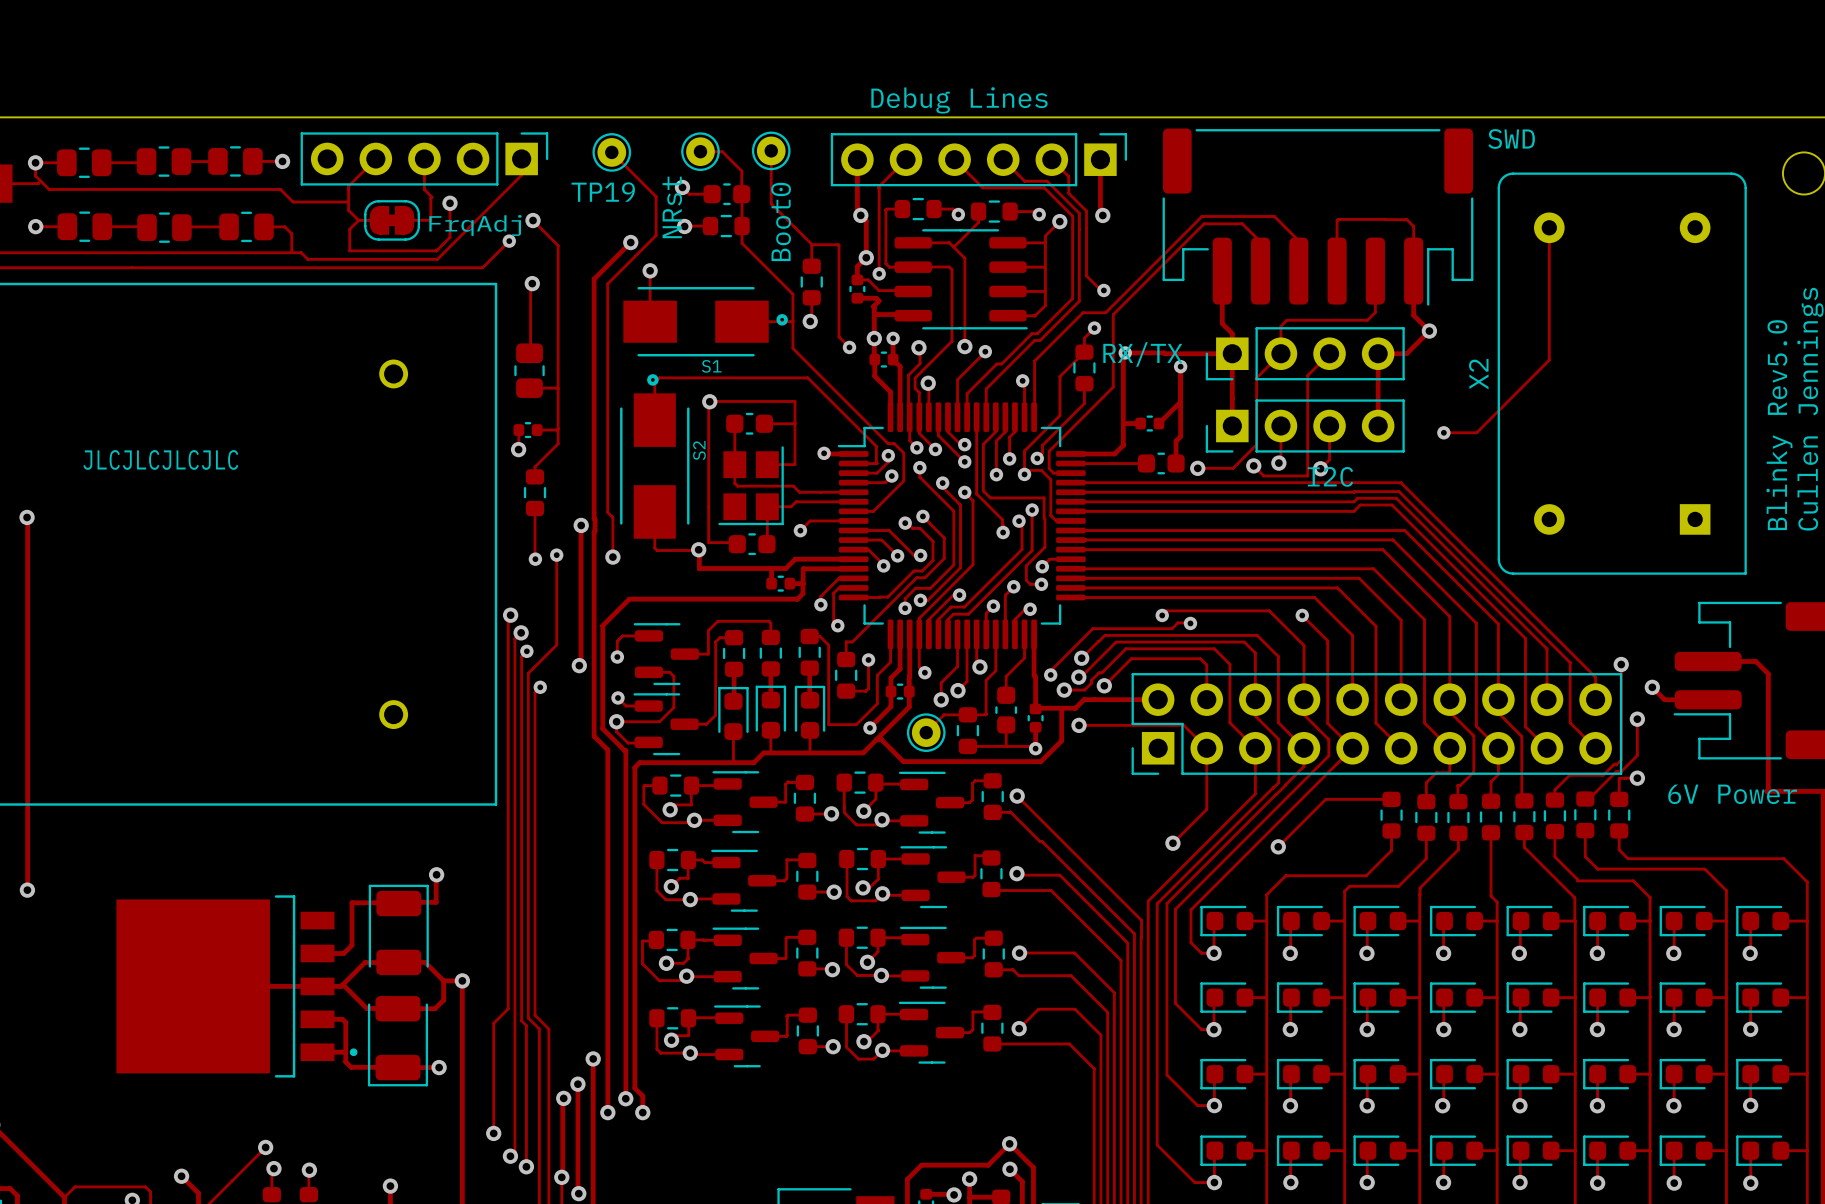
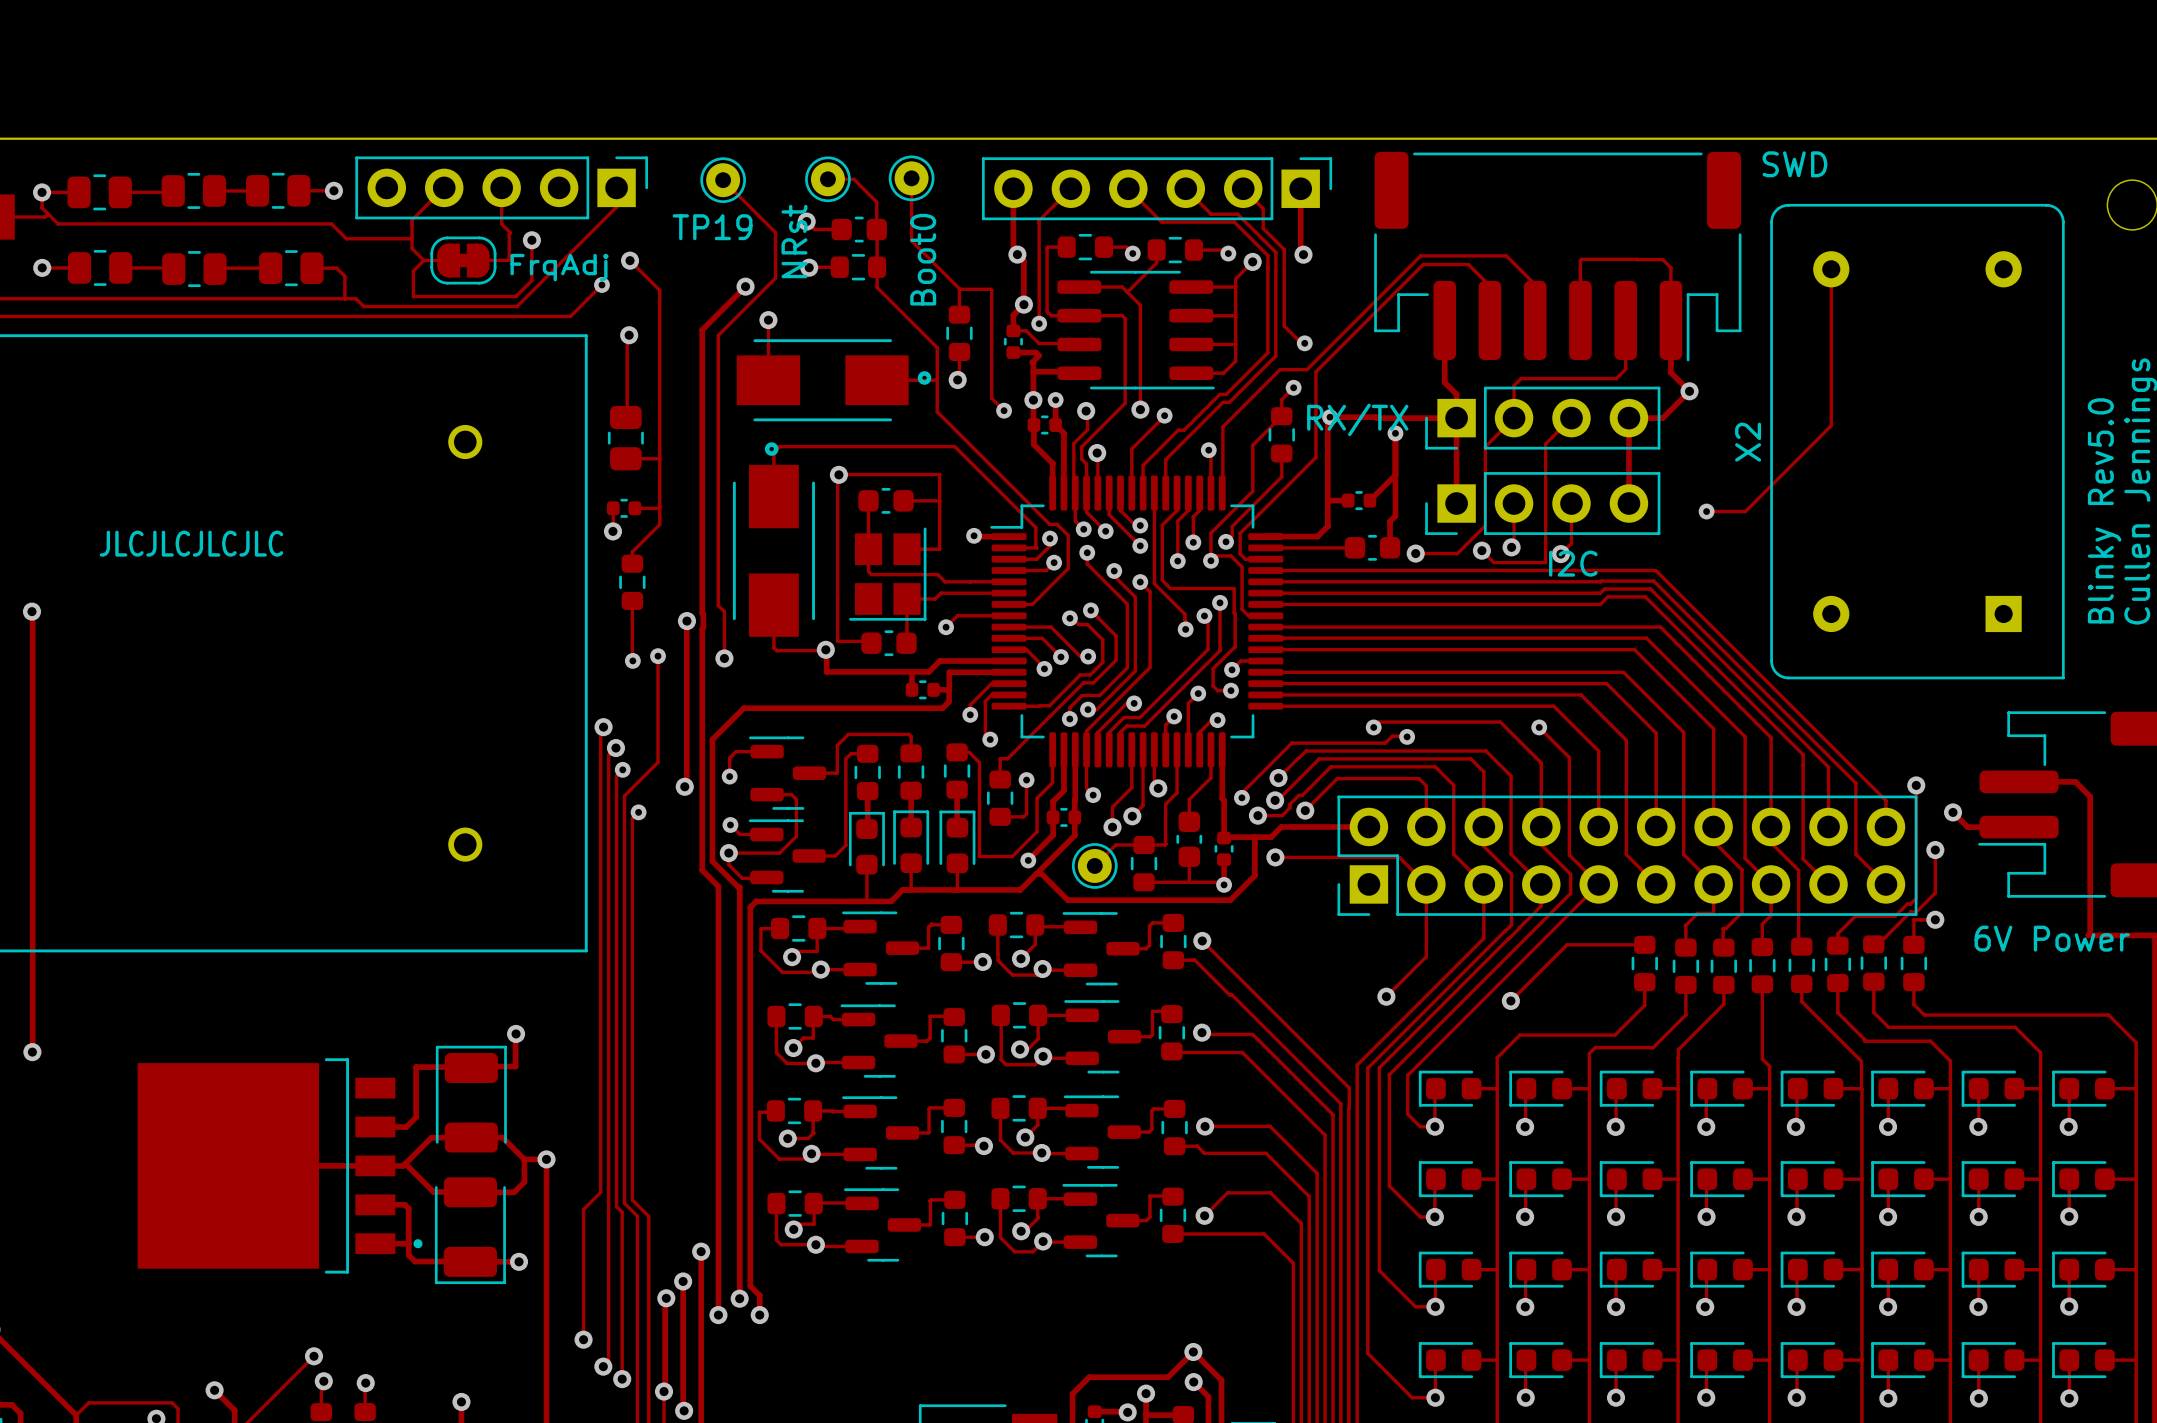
text: Debug Lines (959, 100) -> none
S1 name: S1 (711, 366) -> none
S2 name: S2 (699, 450) -> none

